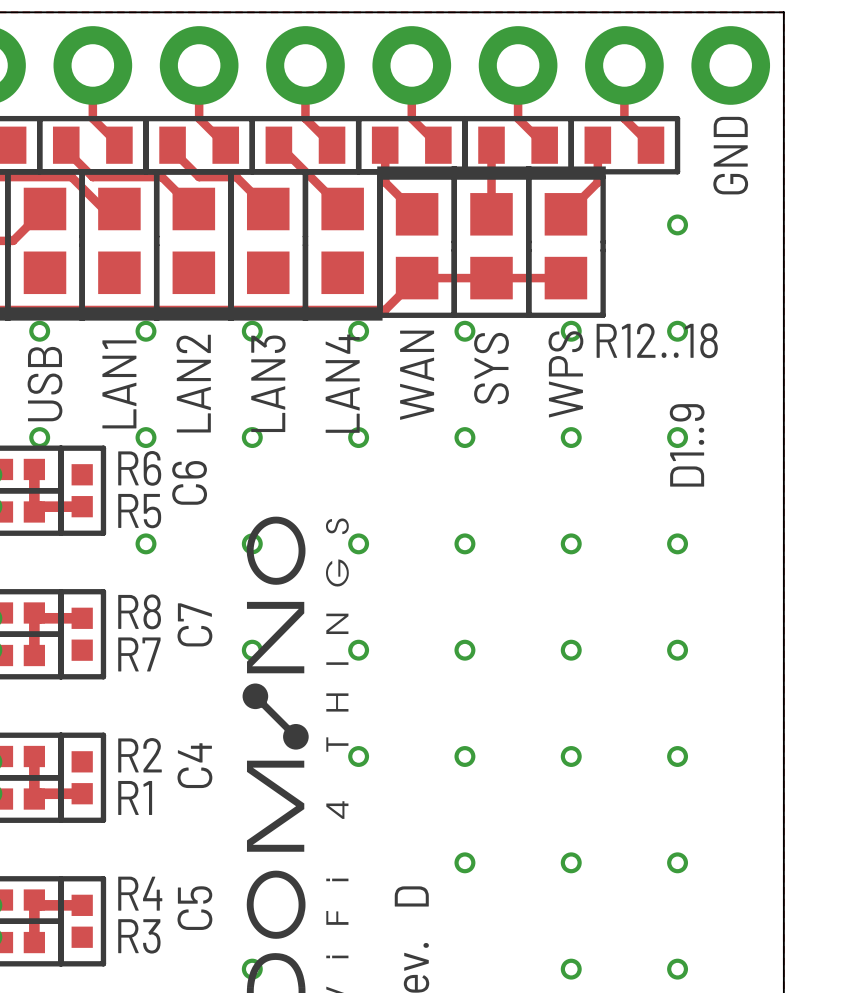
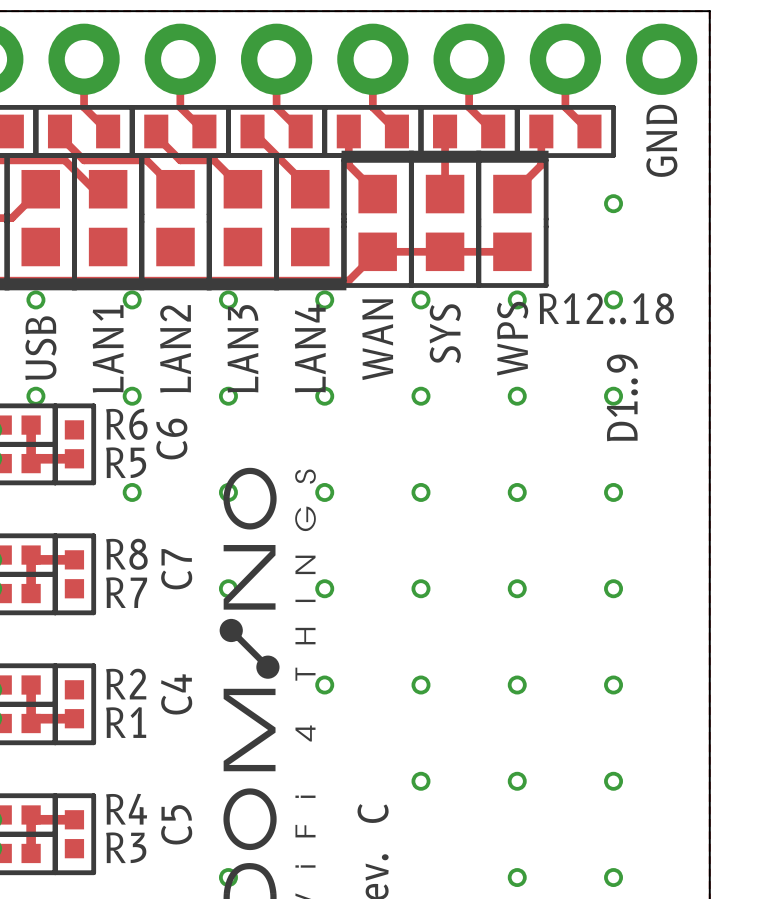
text: D (411, 896) -> C (373, 813)

